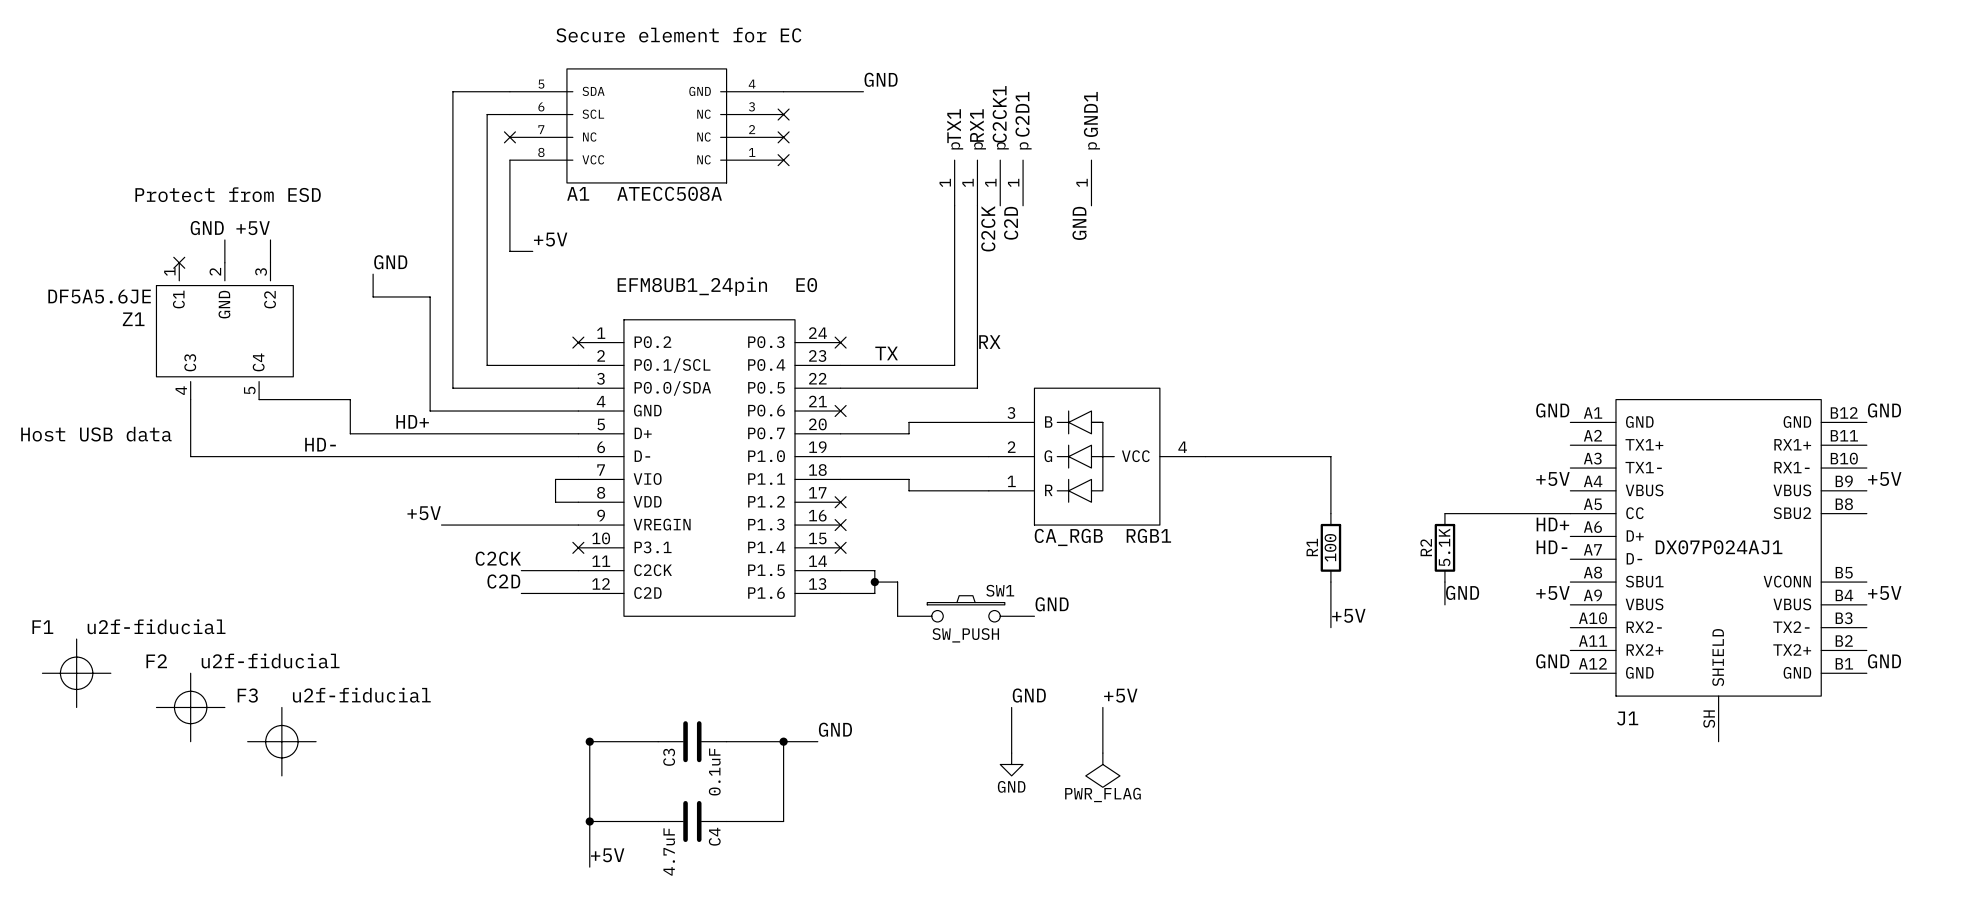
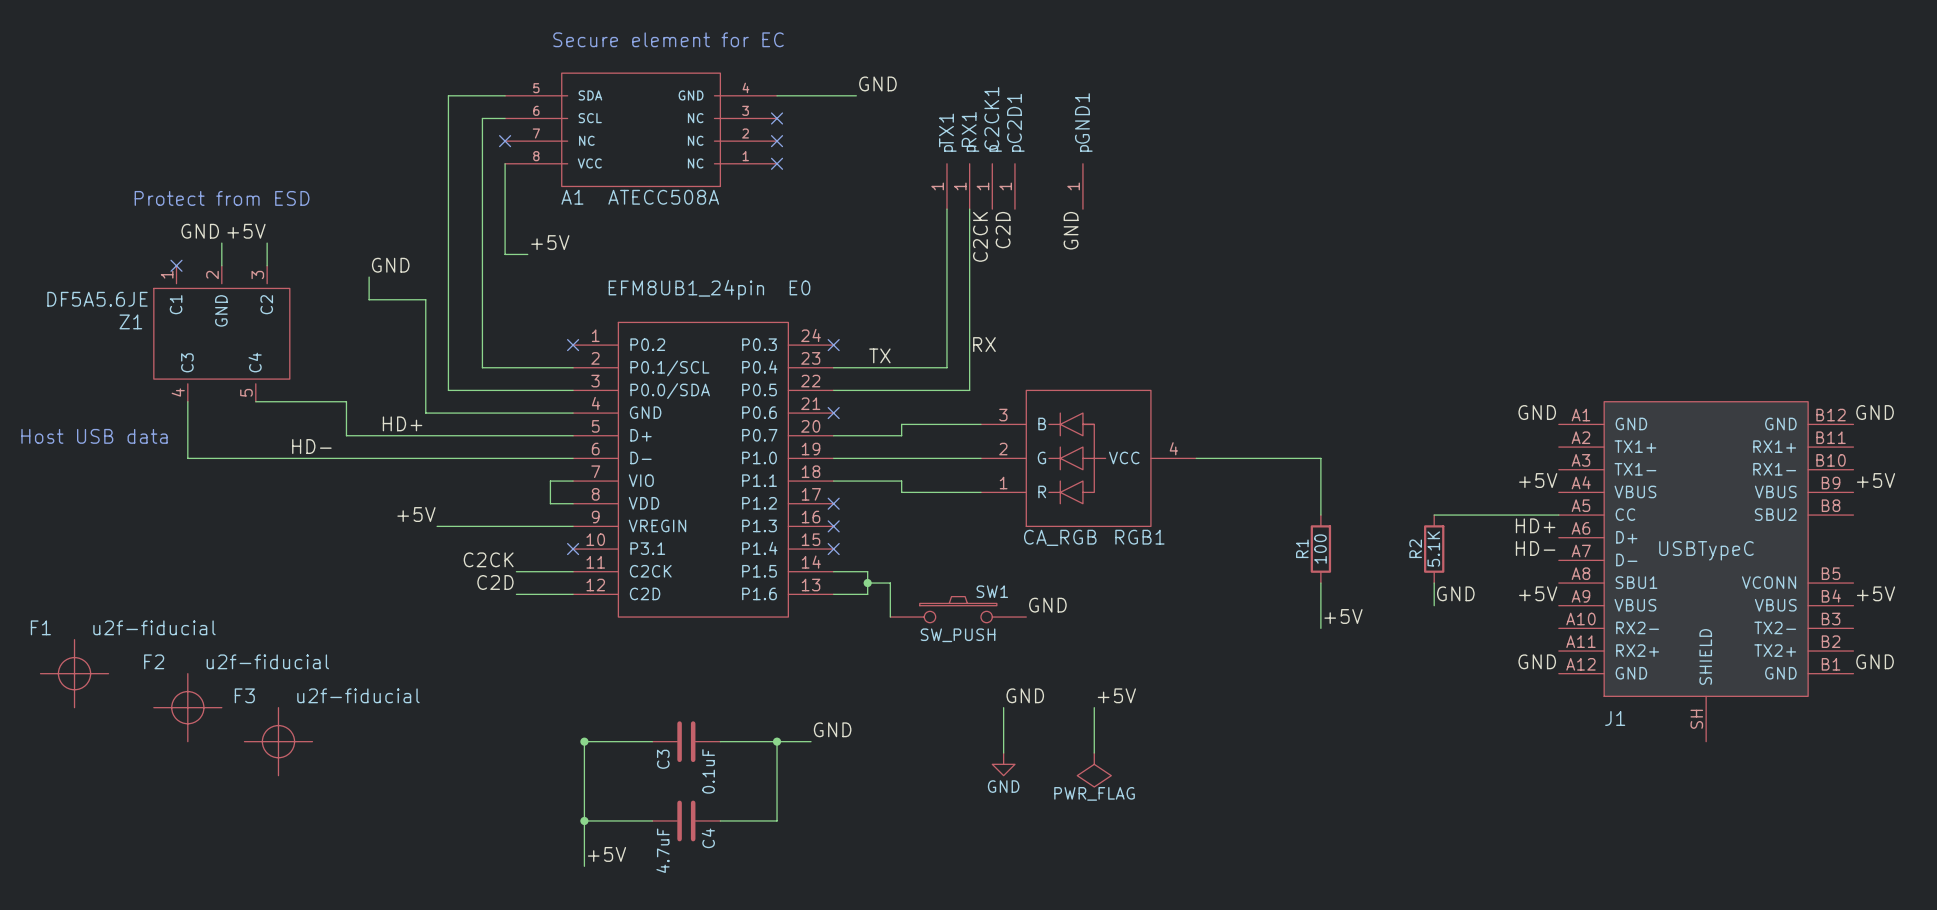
J1 value: DX07P024AJ1 (1719, 547) -> USBTypeC (1706, 550)

